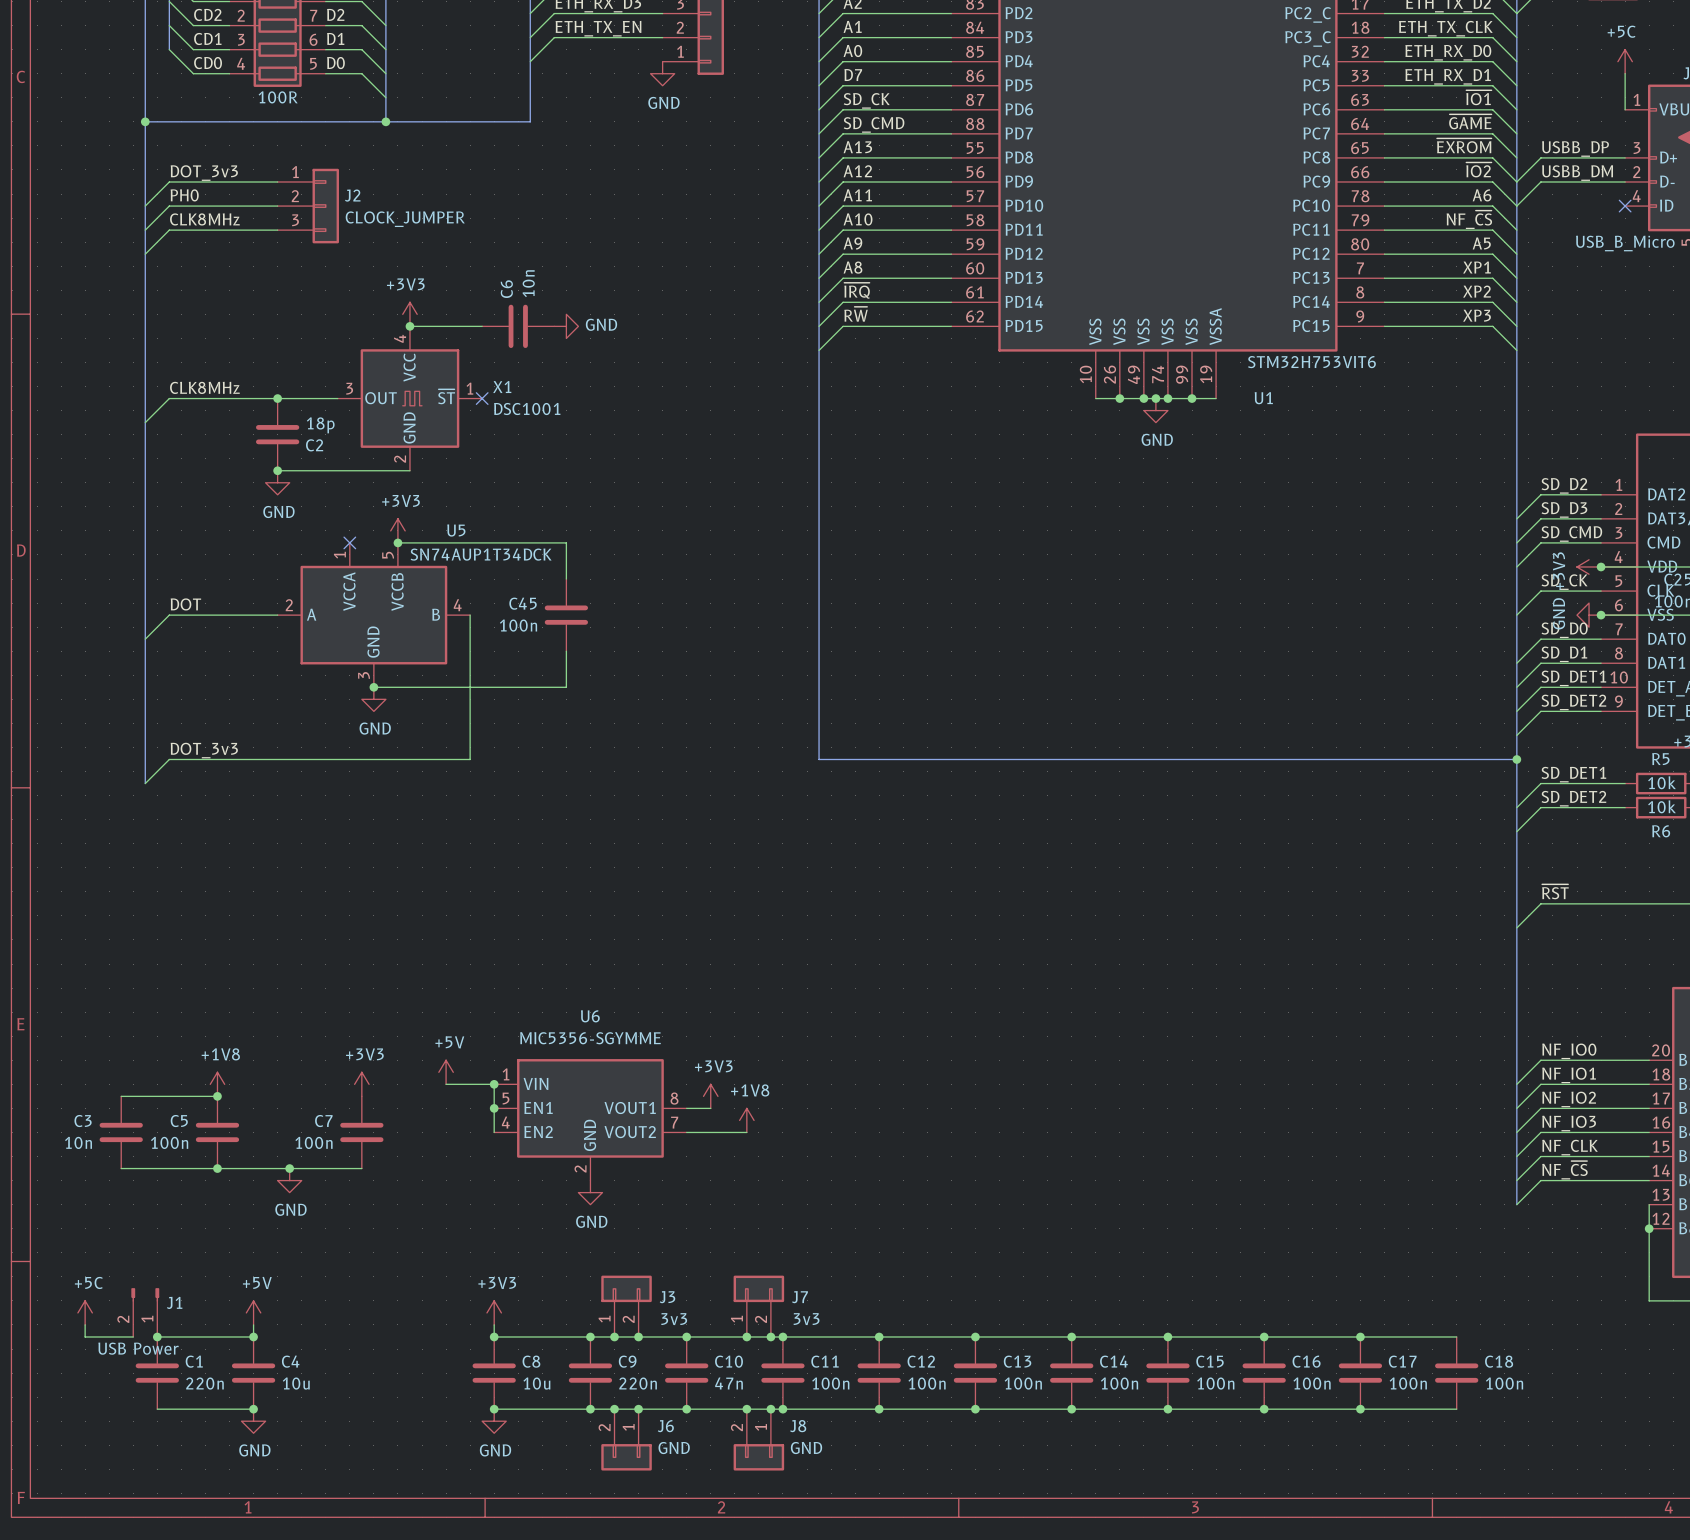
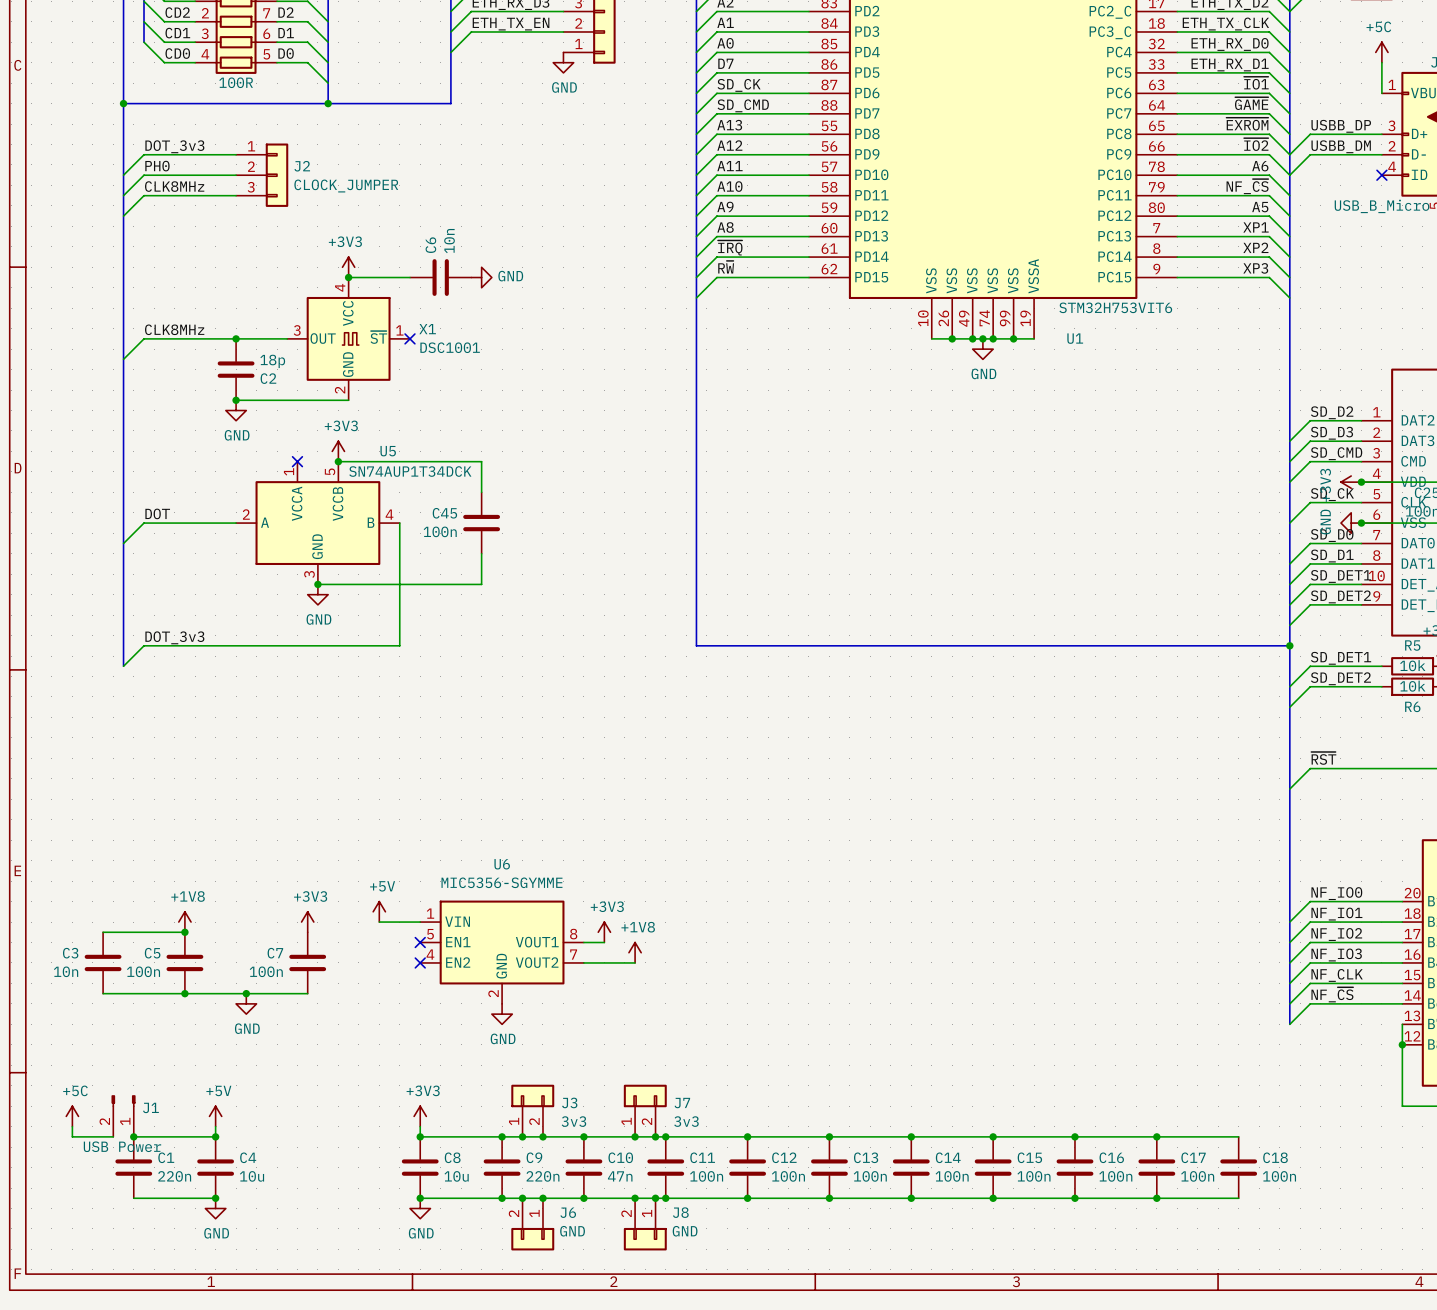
wire: (494, 1084) (494, 1132) -> none
junction: (494, 1084) -> none
junction: (494, 1108) -> none
no-connect mark: none -> (420, 942)
no-connect mark: none -> (420, 962)

